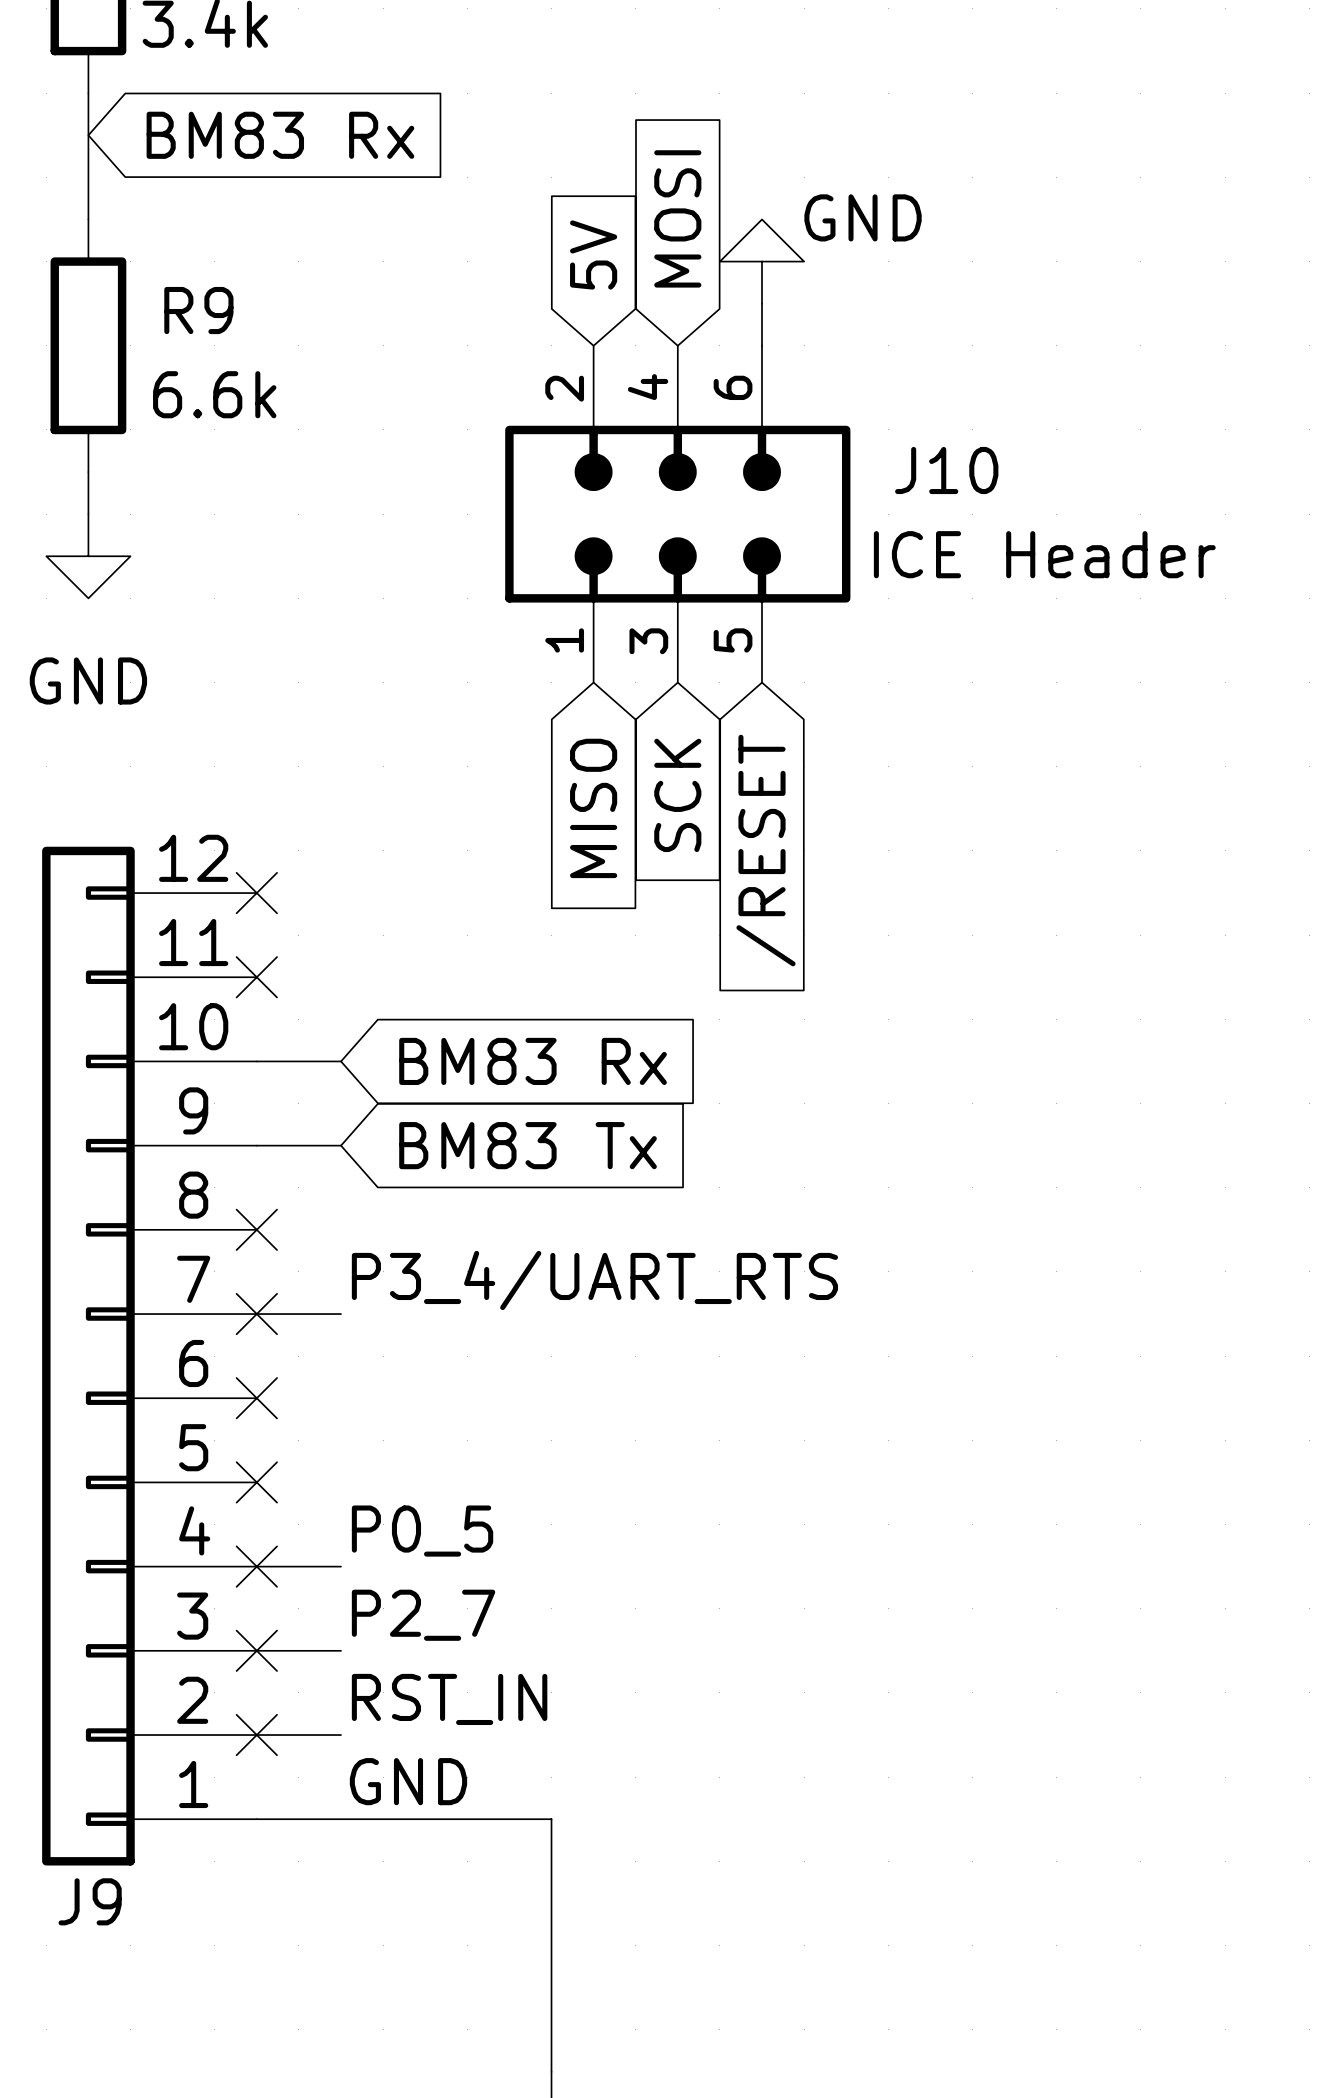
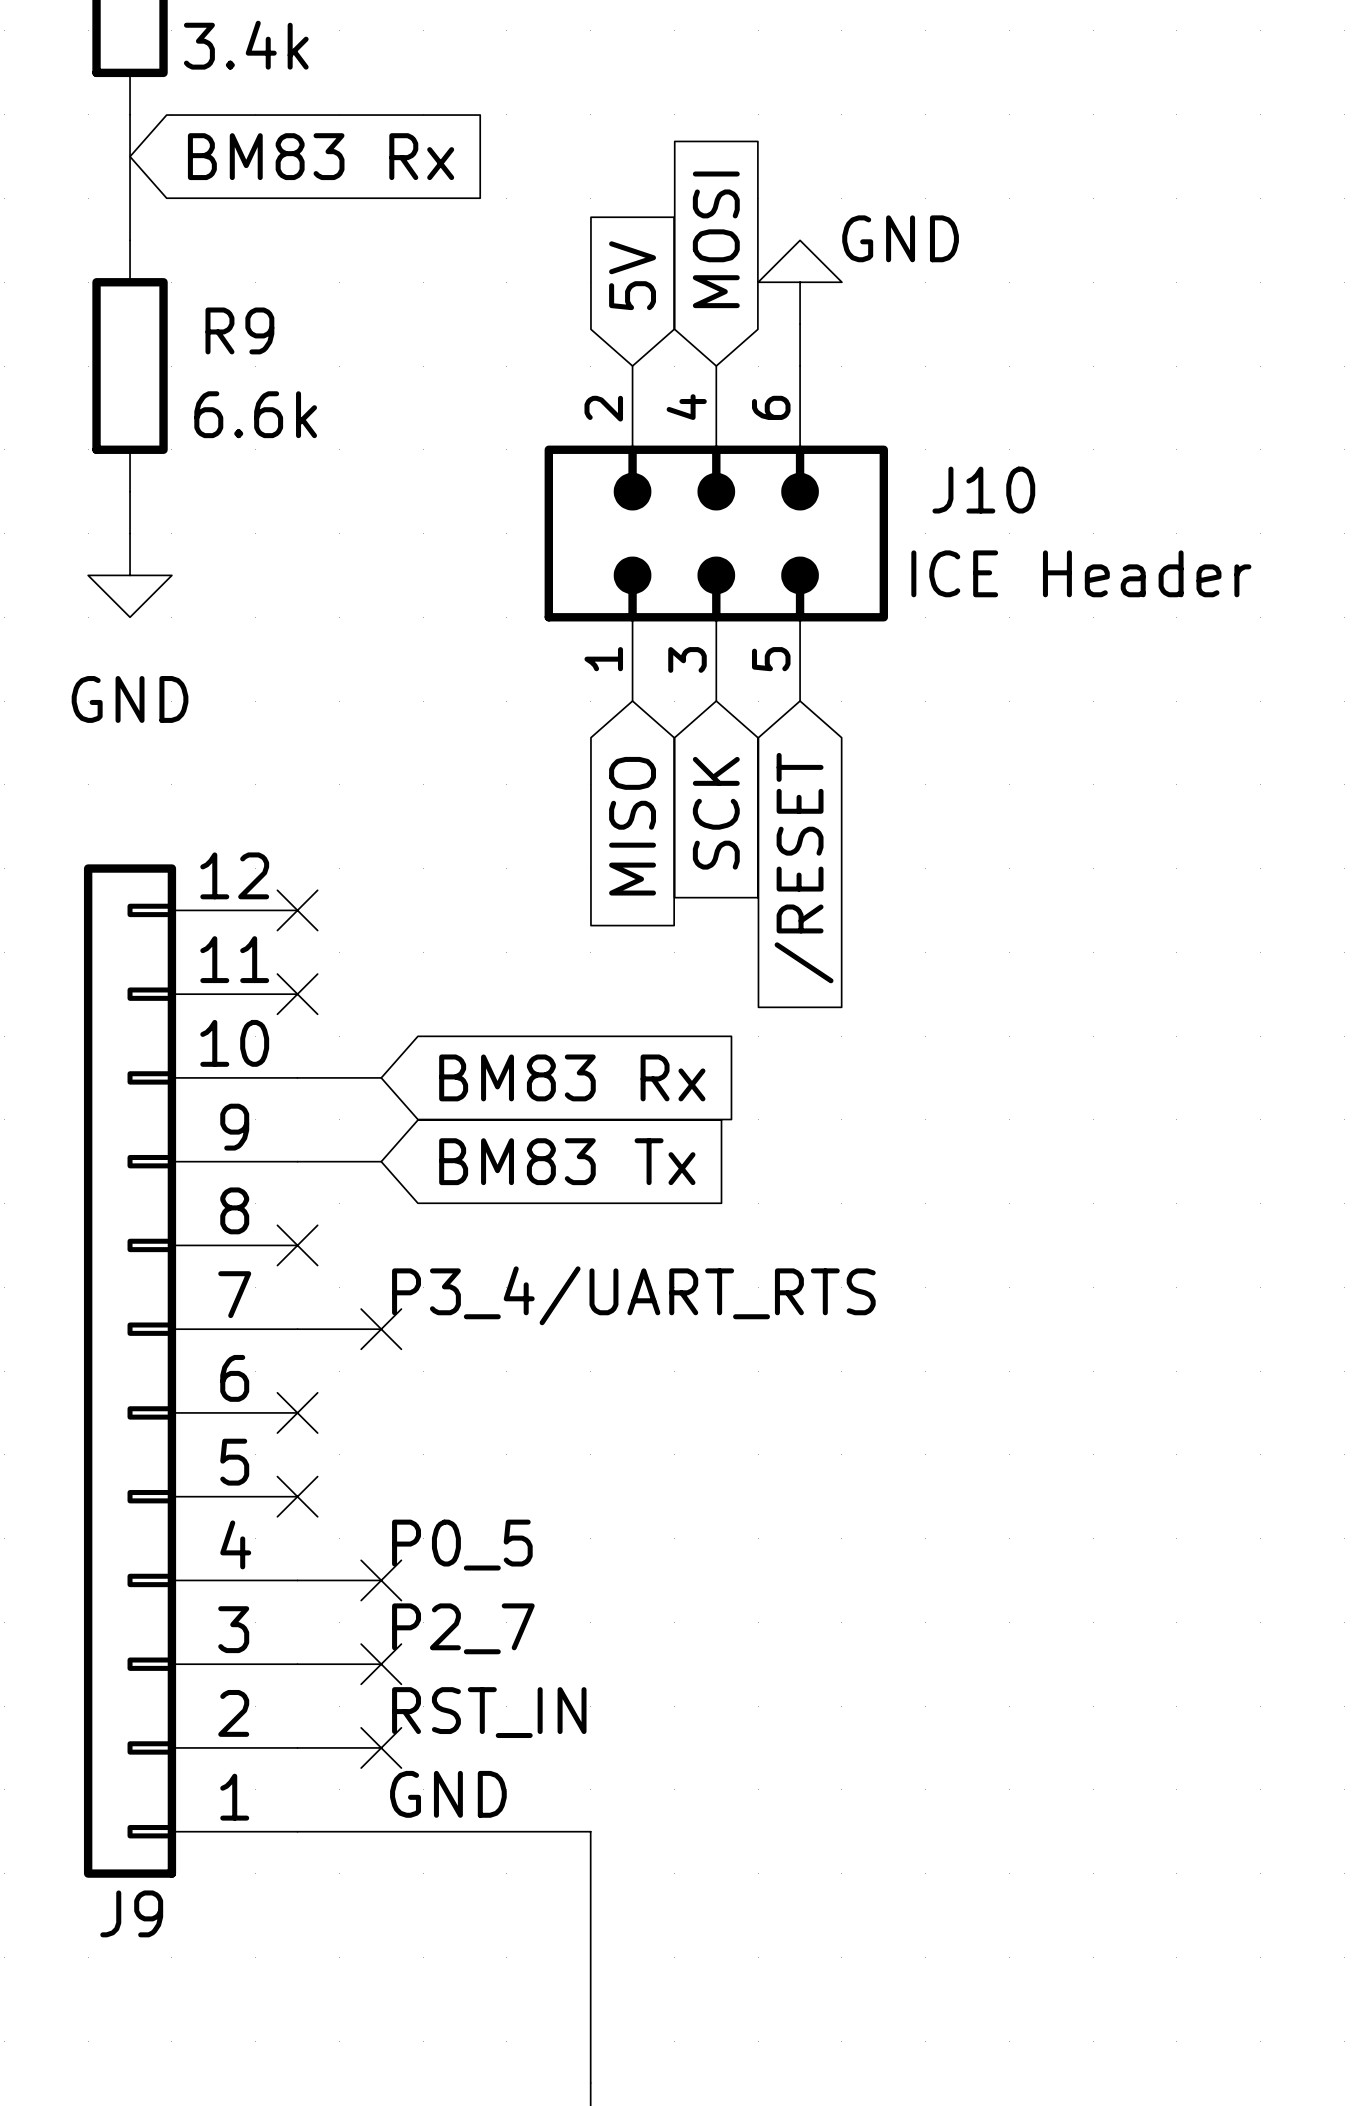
no-connect mark position: (256, 1314) -> (381, 1329)
no-connect mark: (256, 1566) -> none
no-connect mark: none -> (381, 1580)
no-connect mark: (256, 1650) -> none
no-connect mark: none -> (381, 1664)
no-connect mark: (256, 1735) -> none
no-connect mark: none -> (381, 1747)

